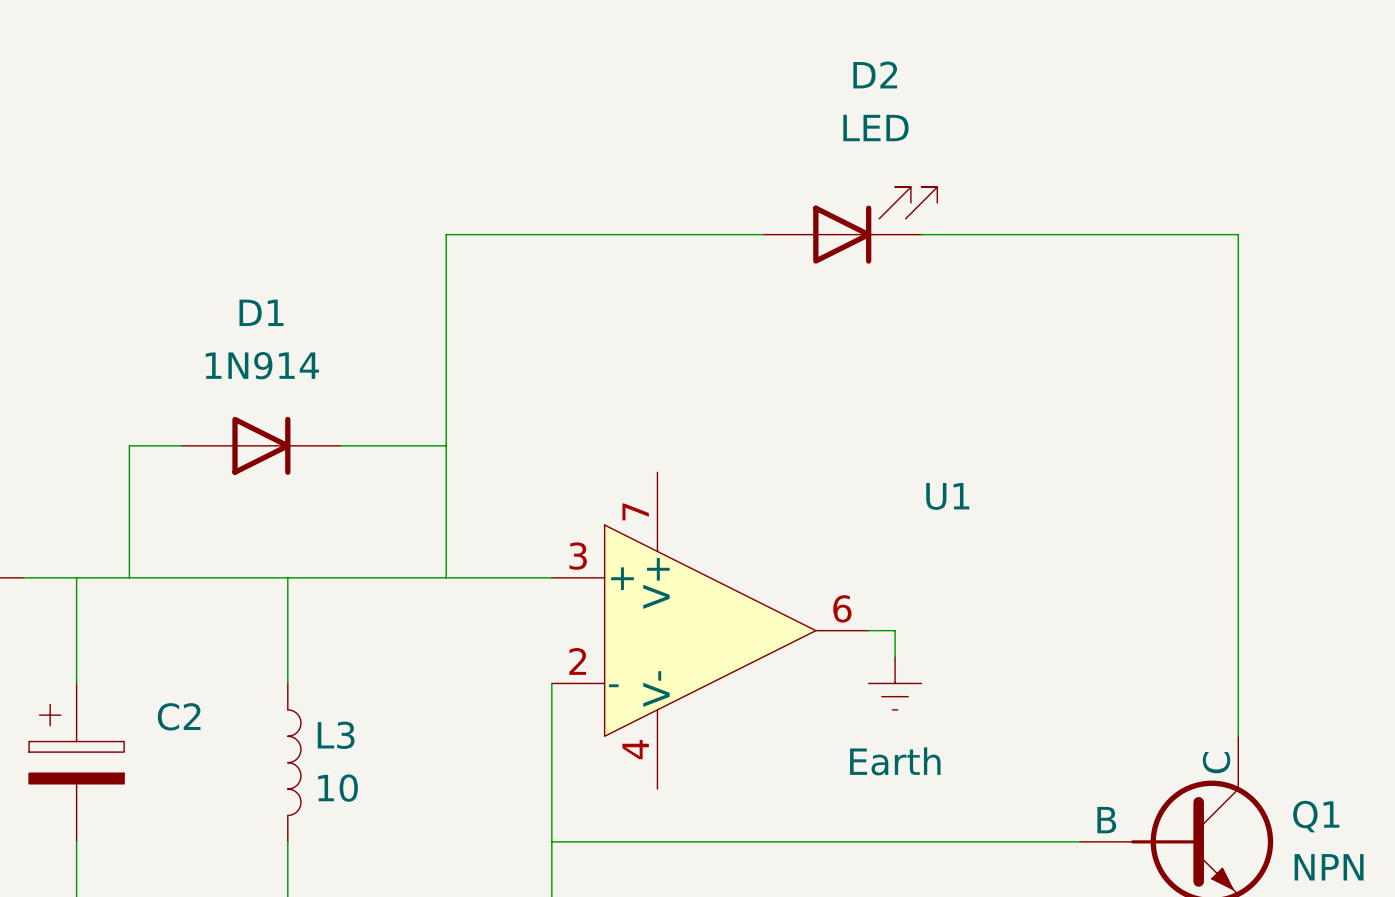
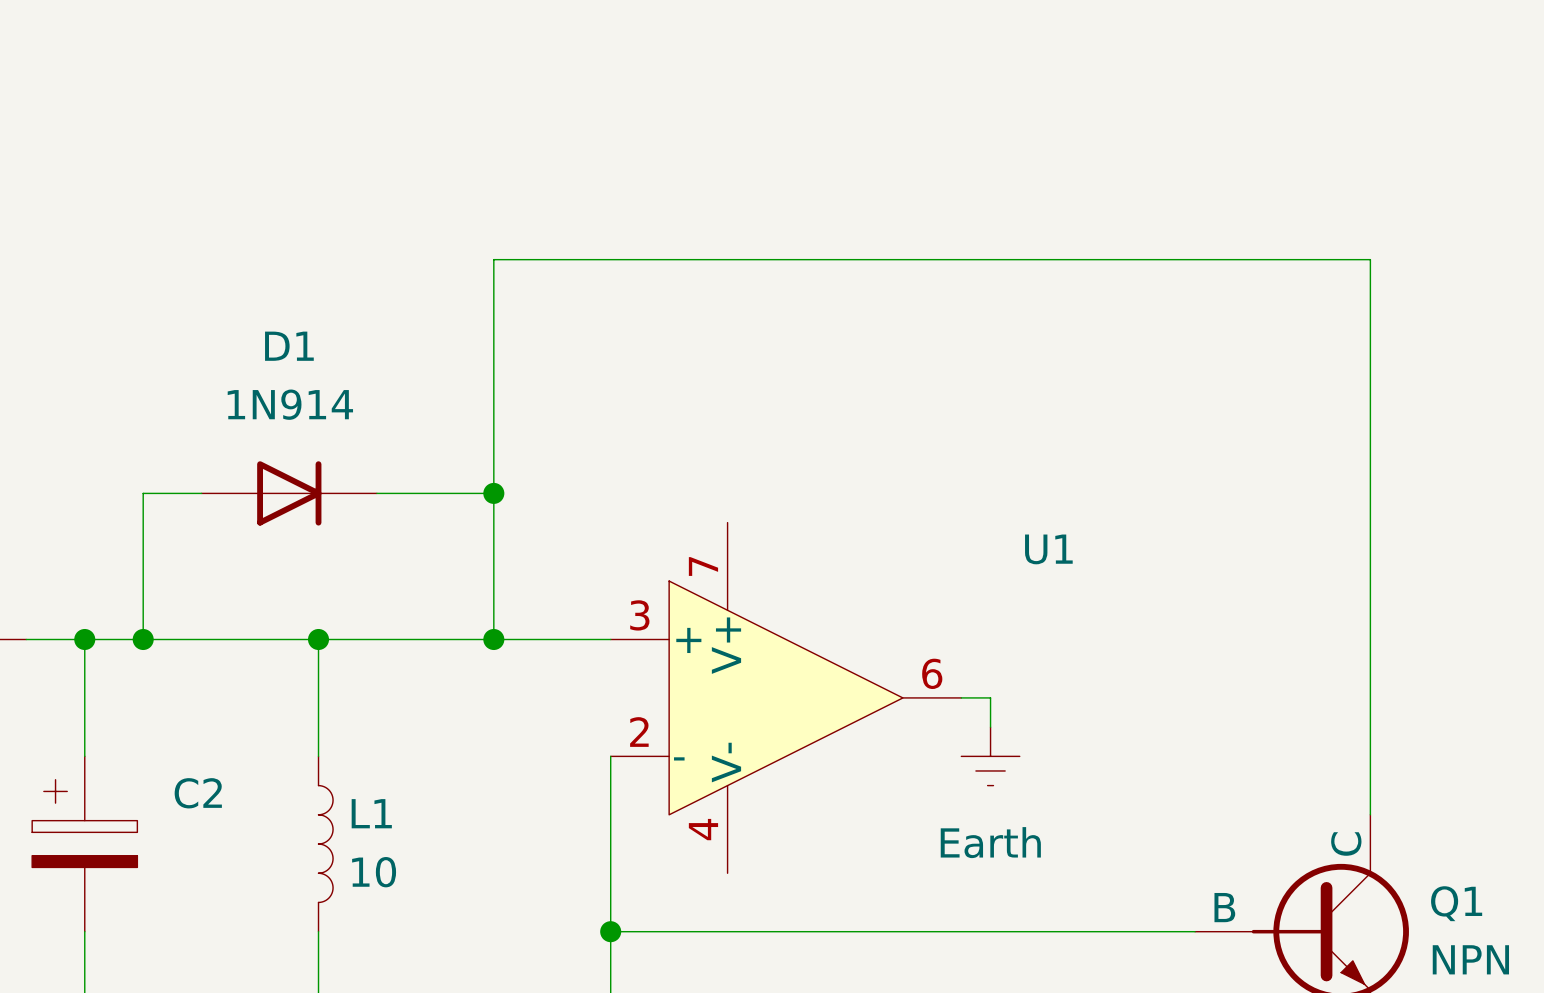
D2: LED (850, 225) -> none
junction: none -> (493, 493)
junction: none -> (84, 639)
junction: none -> (143, 639)
junction: none -> (318, 639)
junction: none -> (493, 639)
L3 name: L3 (336, 735) -> L1 (371, 813)
junction: none -> (610, 931)

